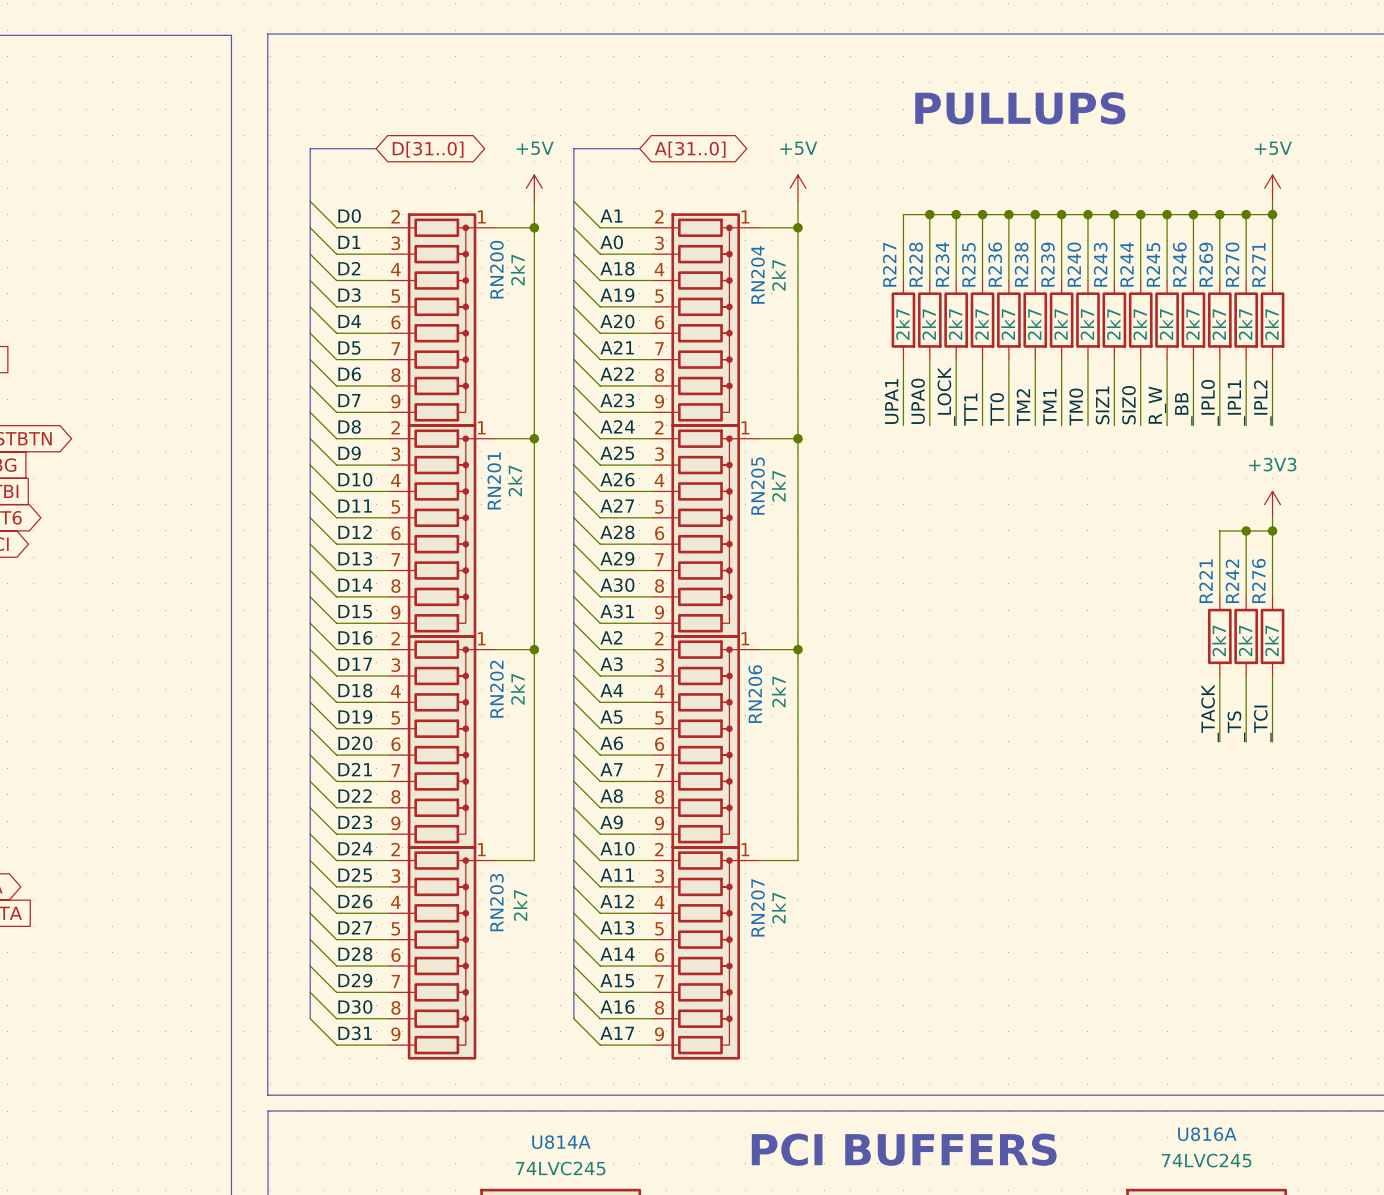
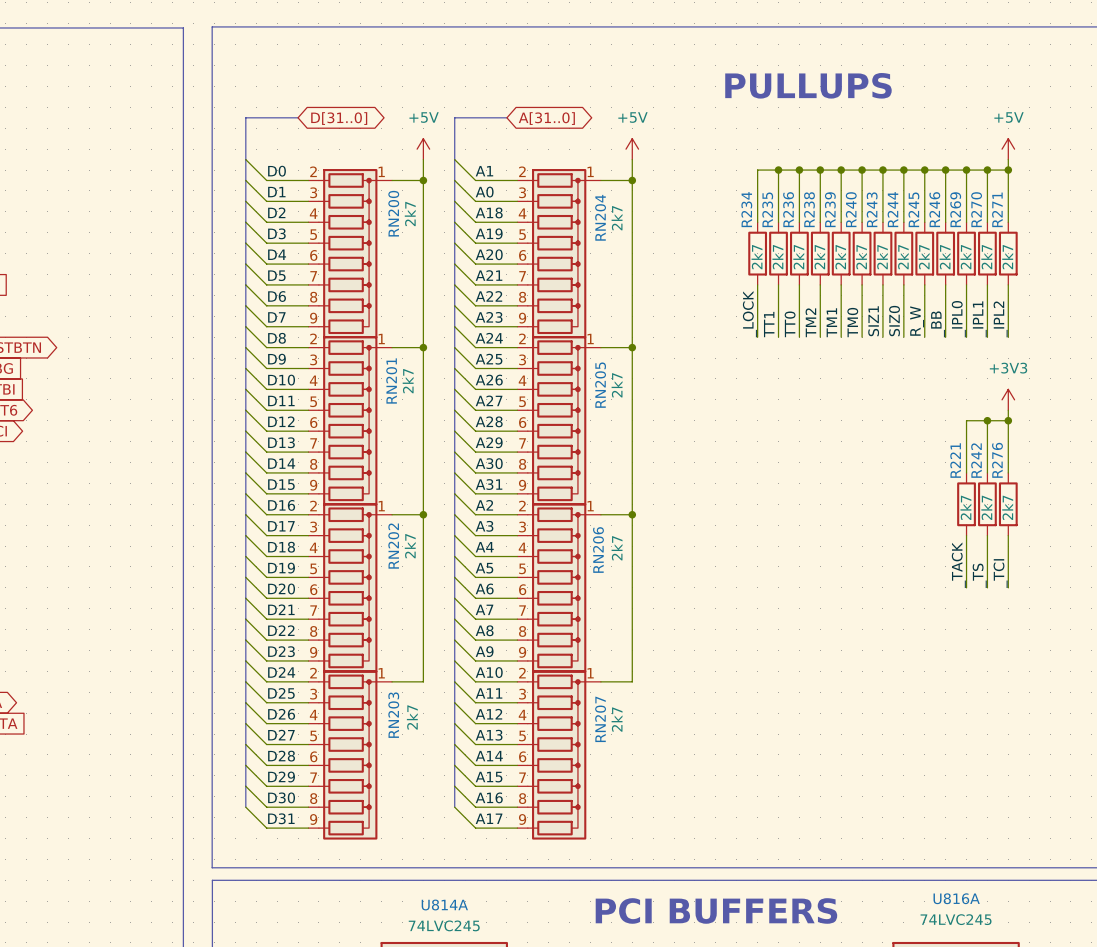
wire: (929, 214) (929, 280) -> none
junction: (929, 214) -> none
wire: (956, 214) (903, 214) (903, 280) -> none
junction: (956, 214) -> none
R227: 2k7 (903, 320) -> none
R228: 2k7 (929, 320) -> none
wire: (903, 359) (903, 425) -> none
wire: (929, 359) (929, 425) -> none
label: UPA1 (891, 401) -> none
label: UPA0 (918, 401) -> none

